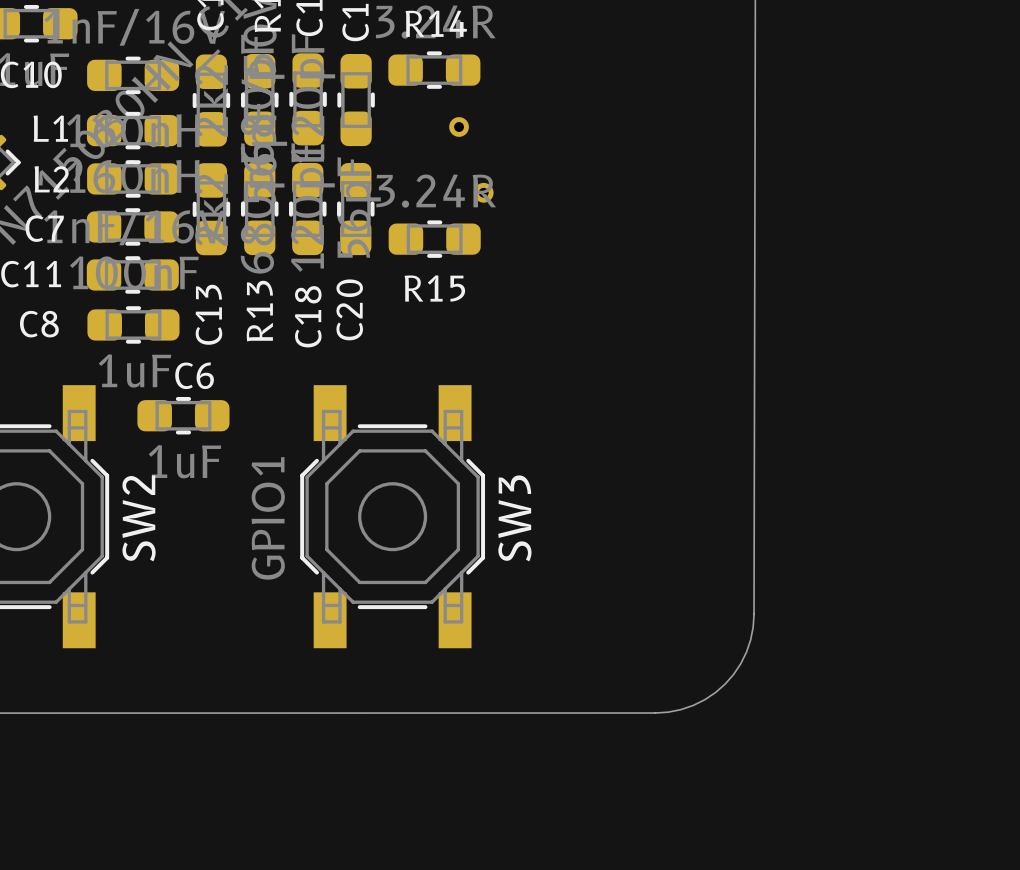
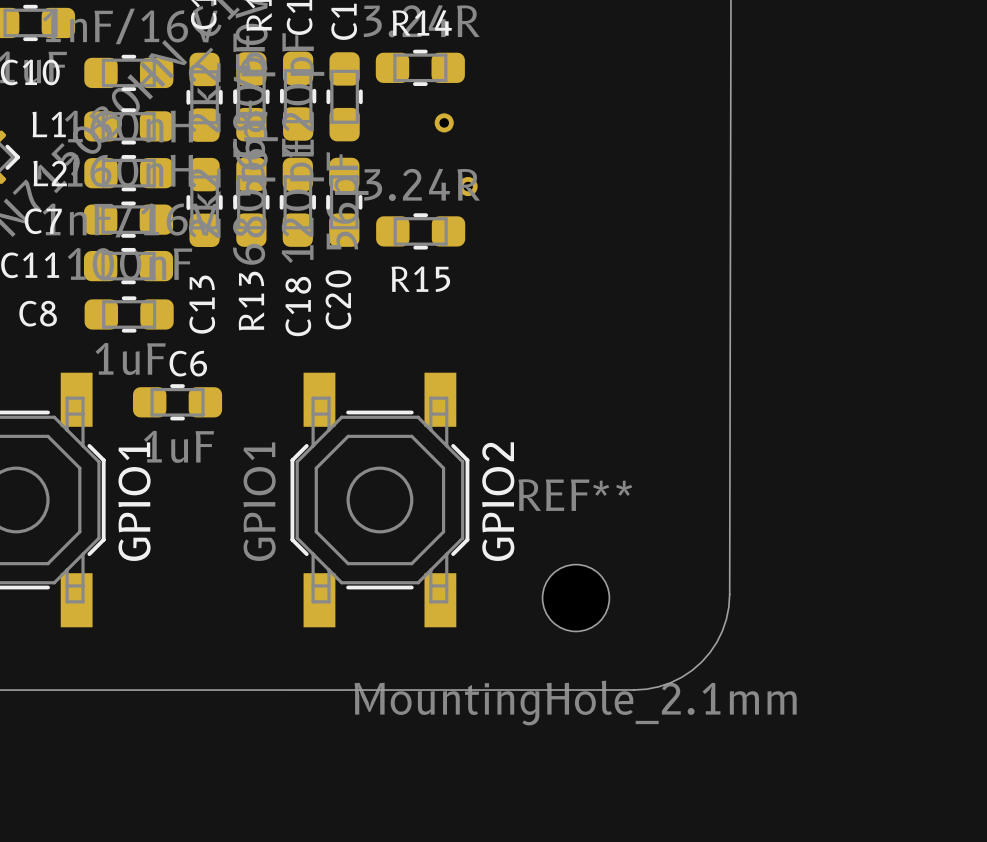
SW2 name: SW2 (139, 518) -> GPIO1 (134, 501)
SW3 name: SW3 (514, 518) -> GPIO2 (498, 501)
REF**: none -> MountingHole_2.1mm (575, 598)

